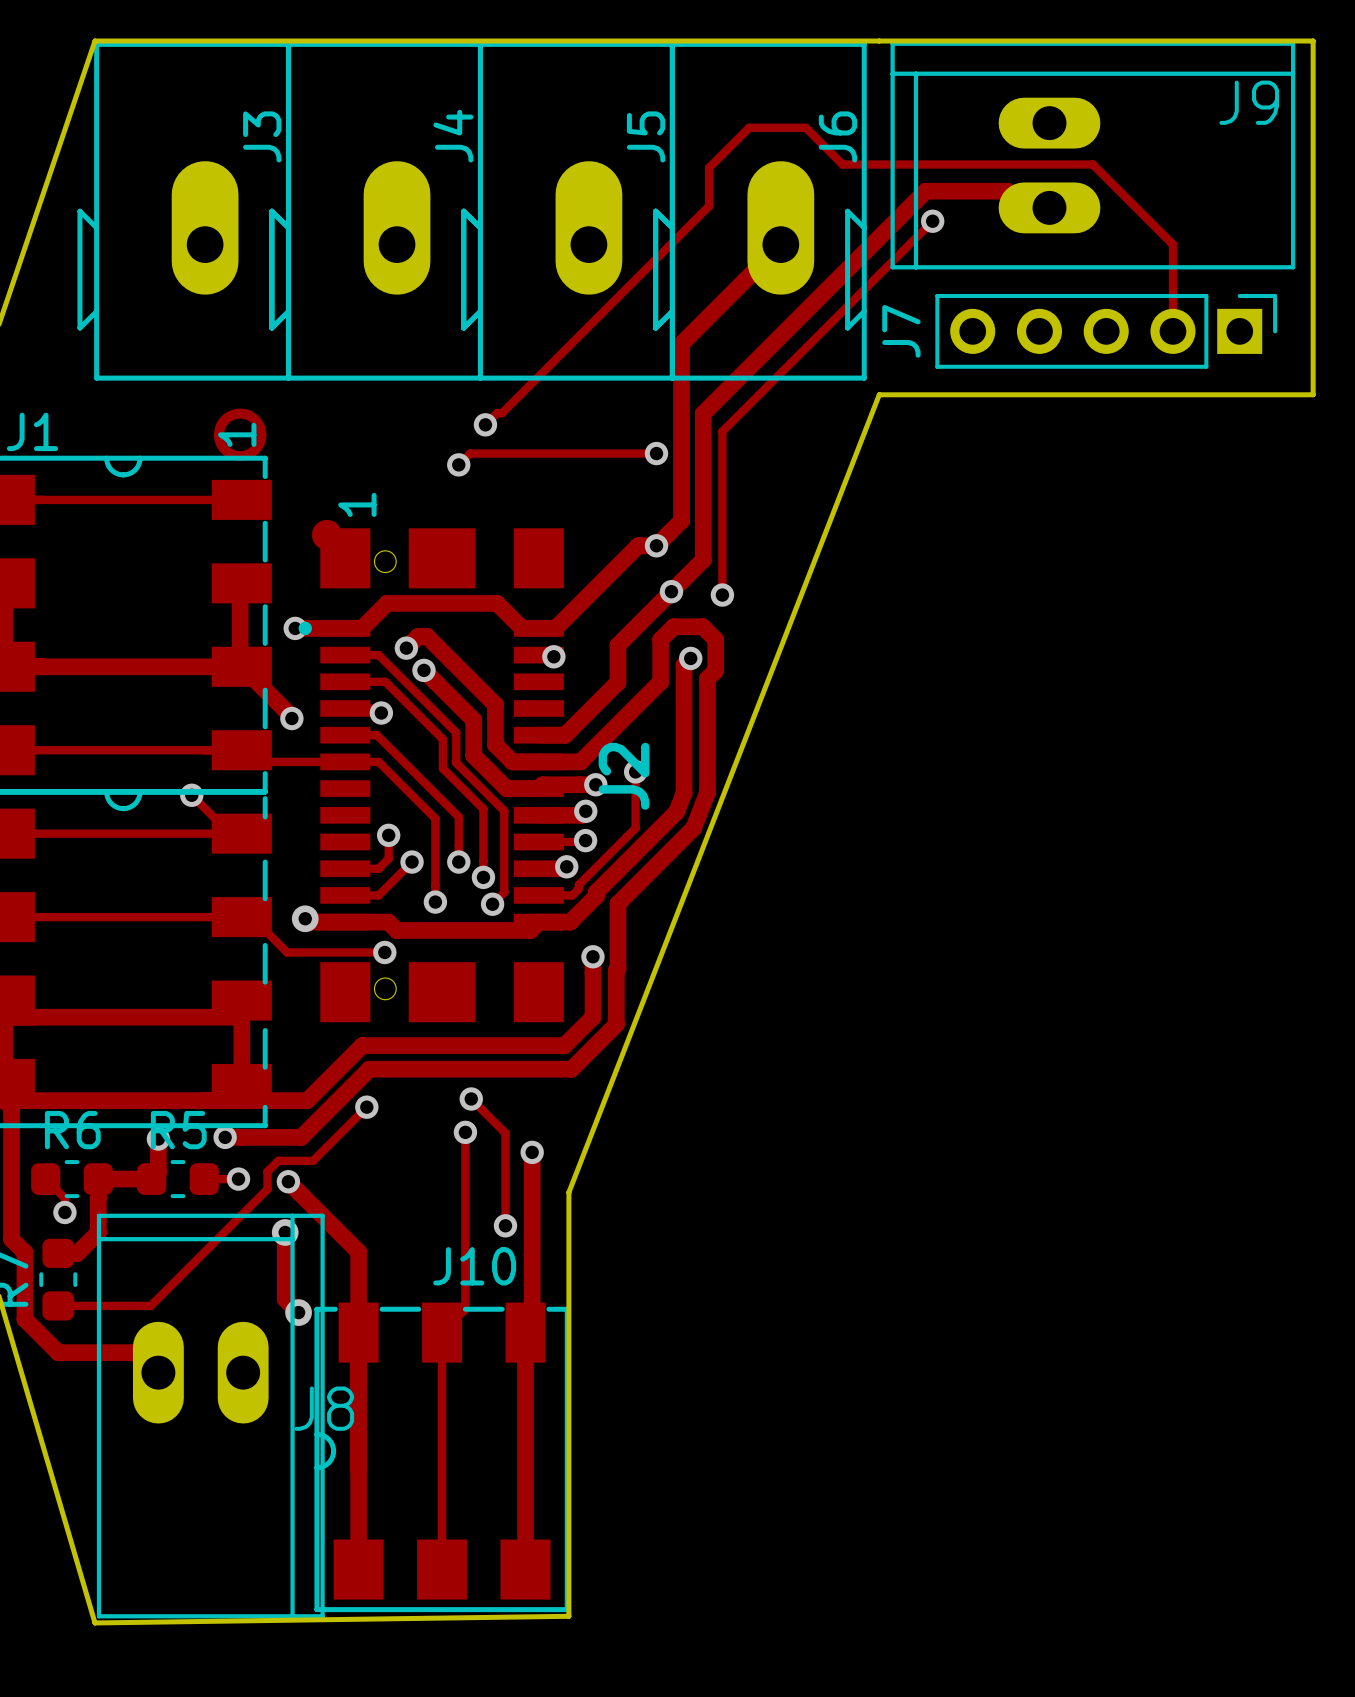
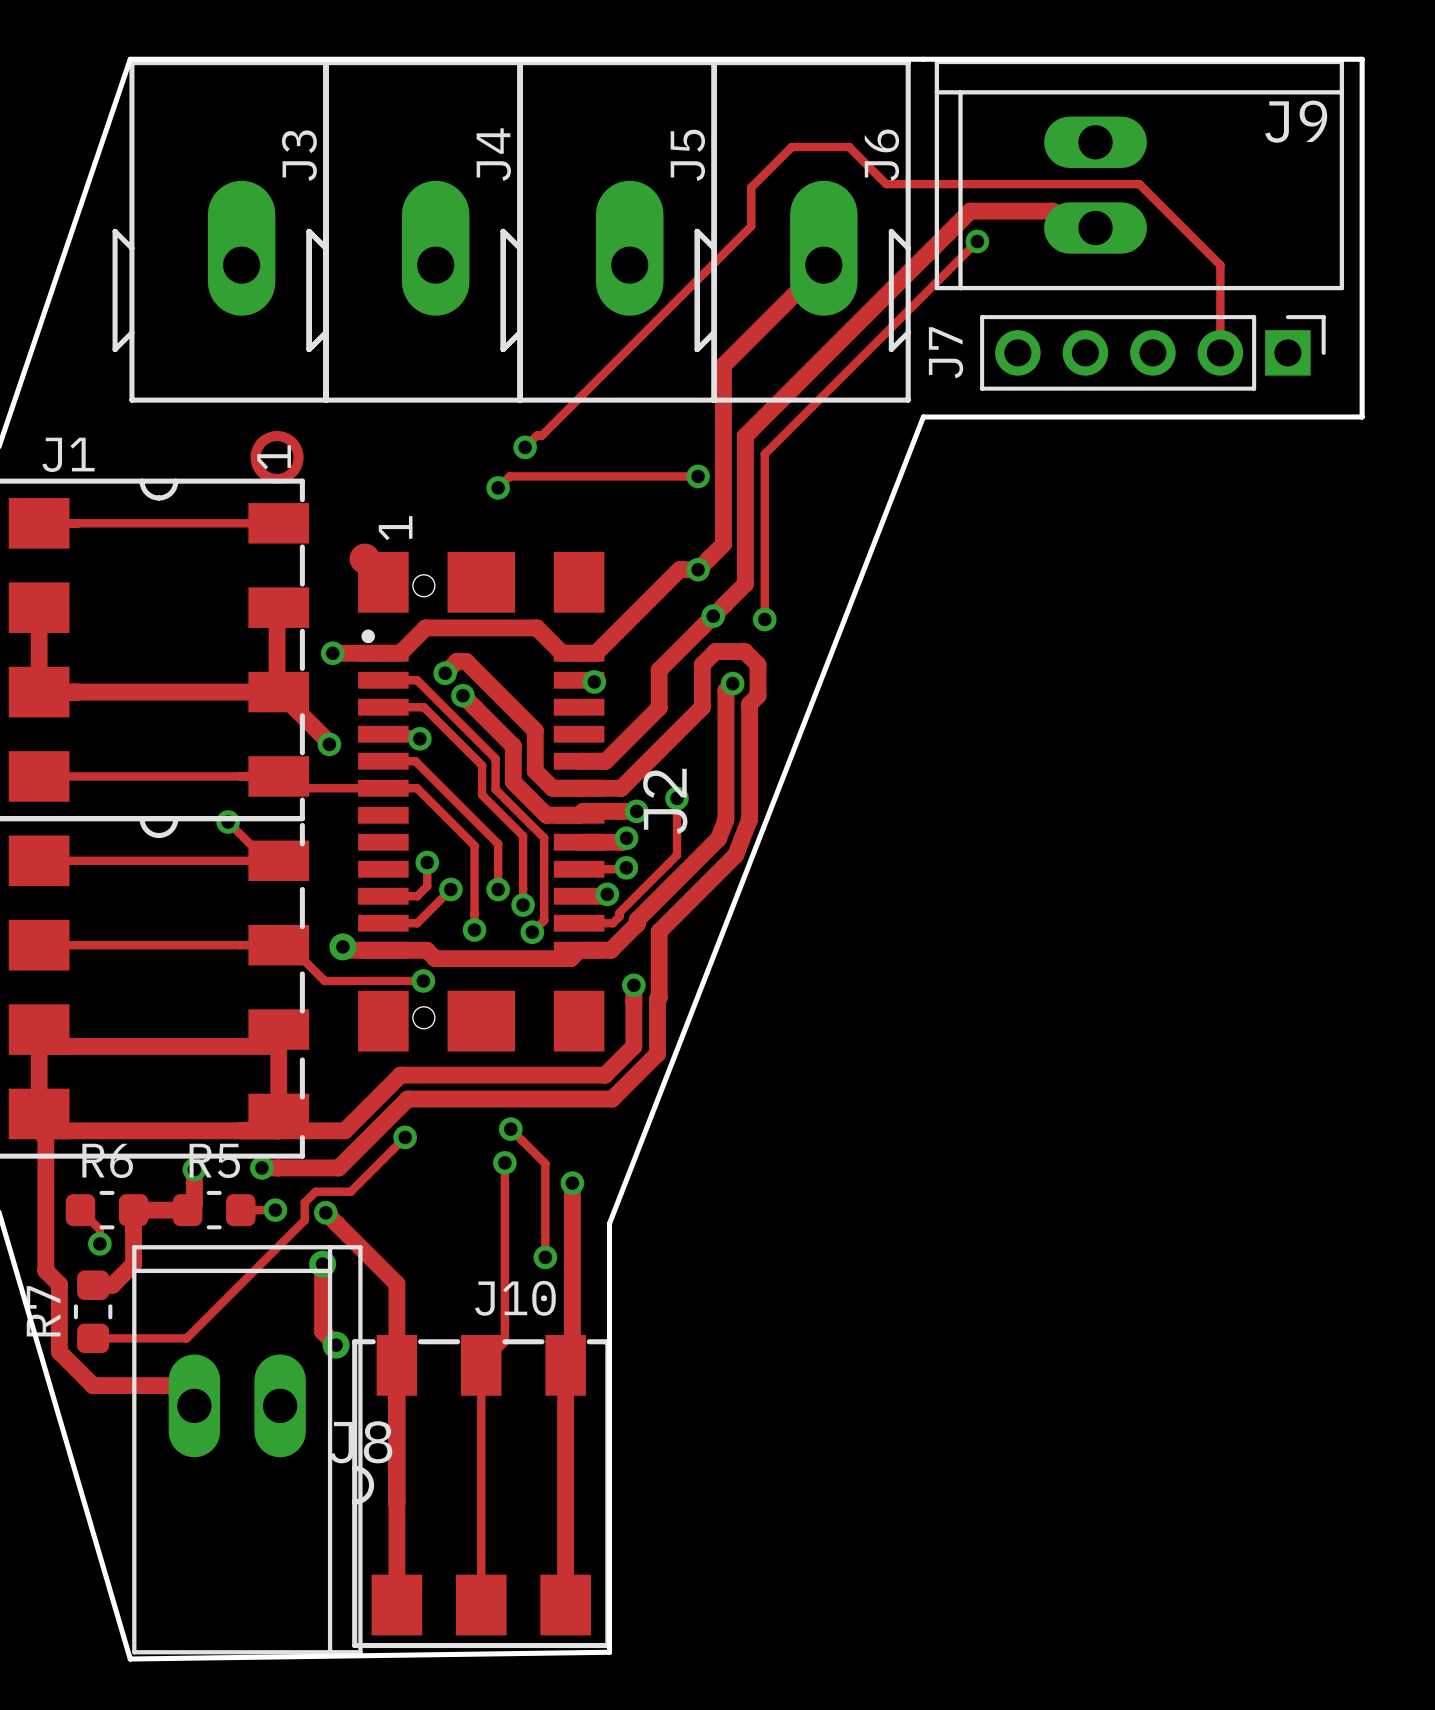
J2 footprint: [298, 519, 564, 1023] -> [349, 543, 605, 1052]

